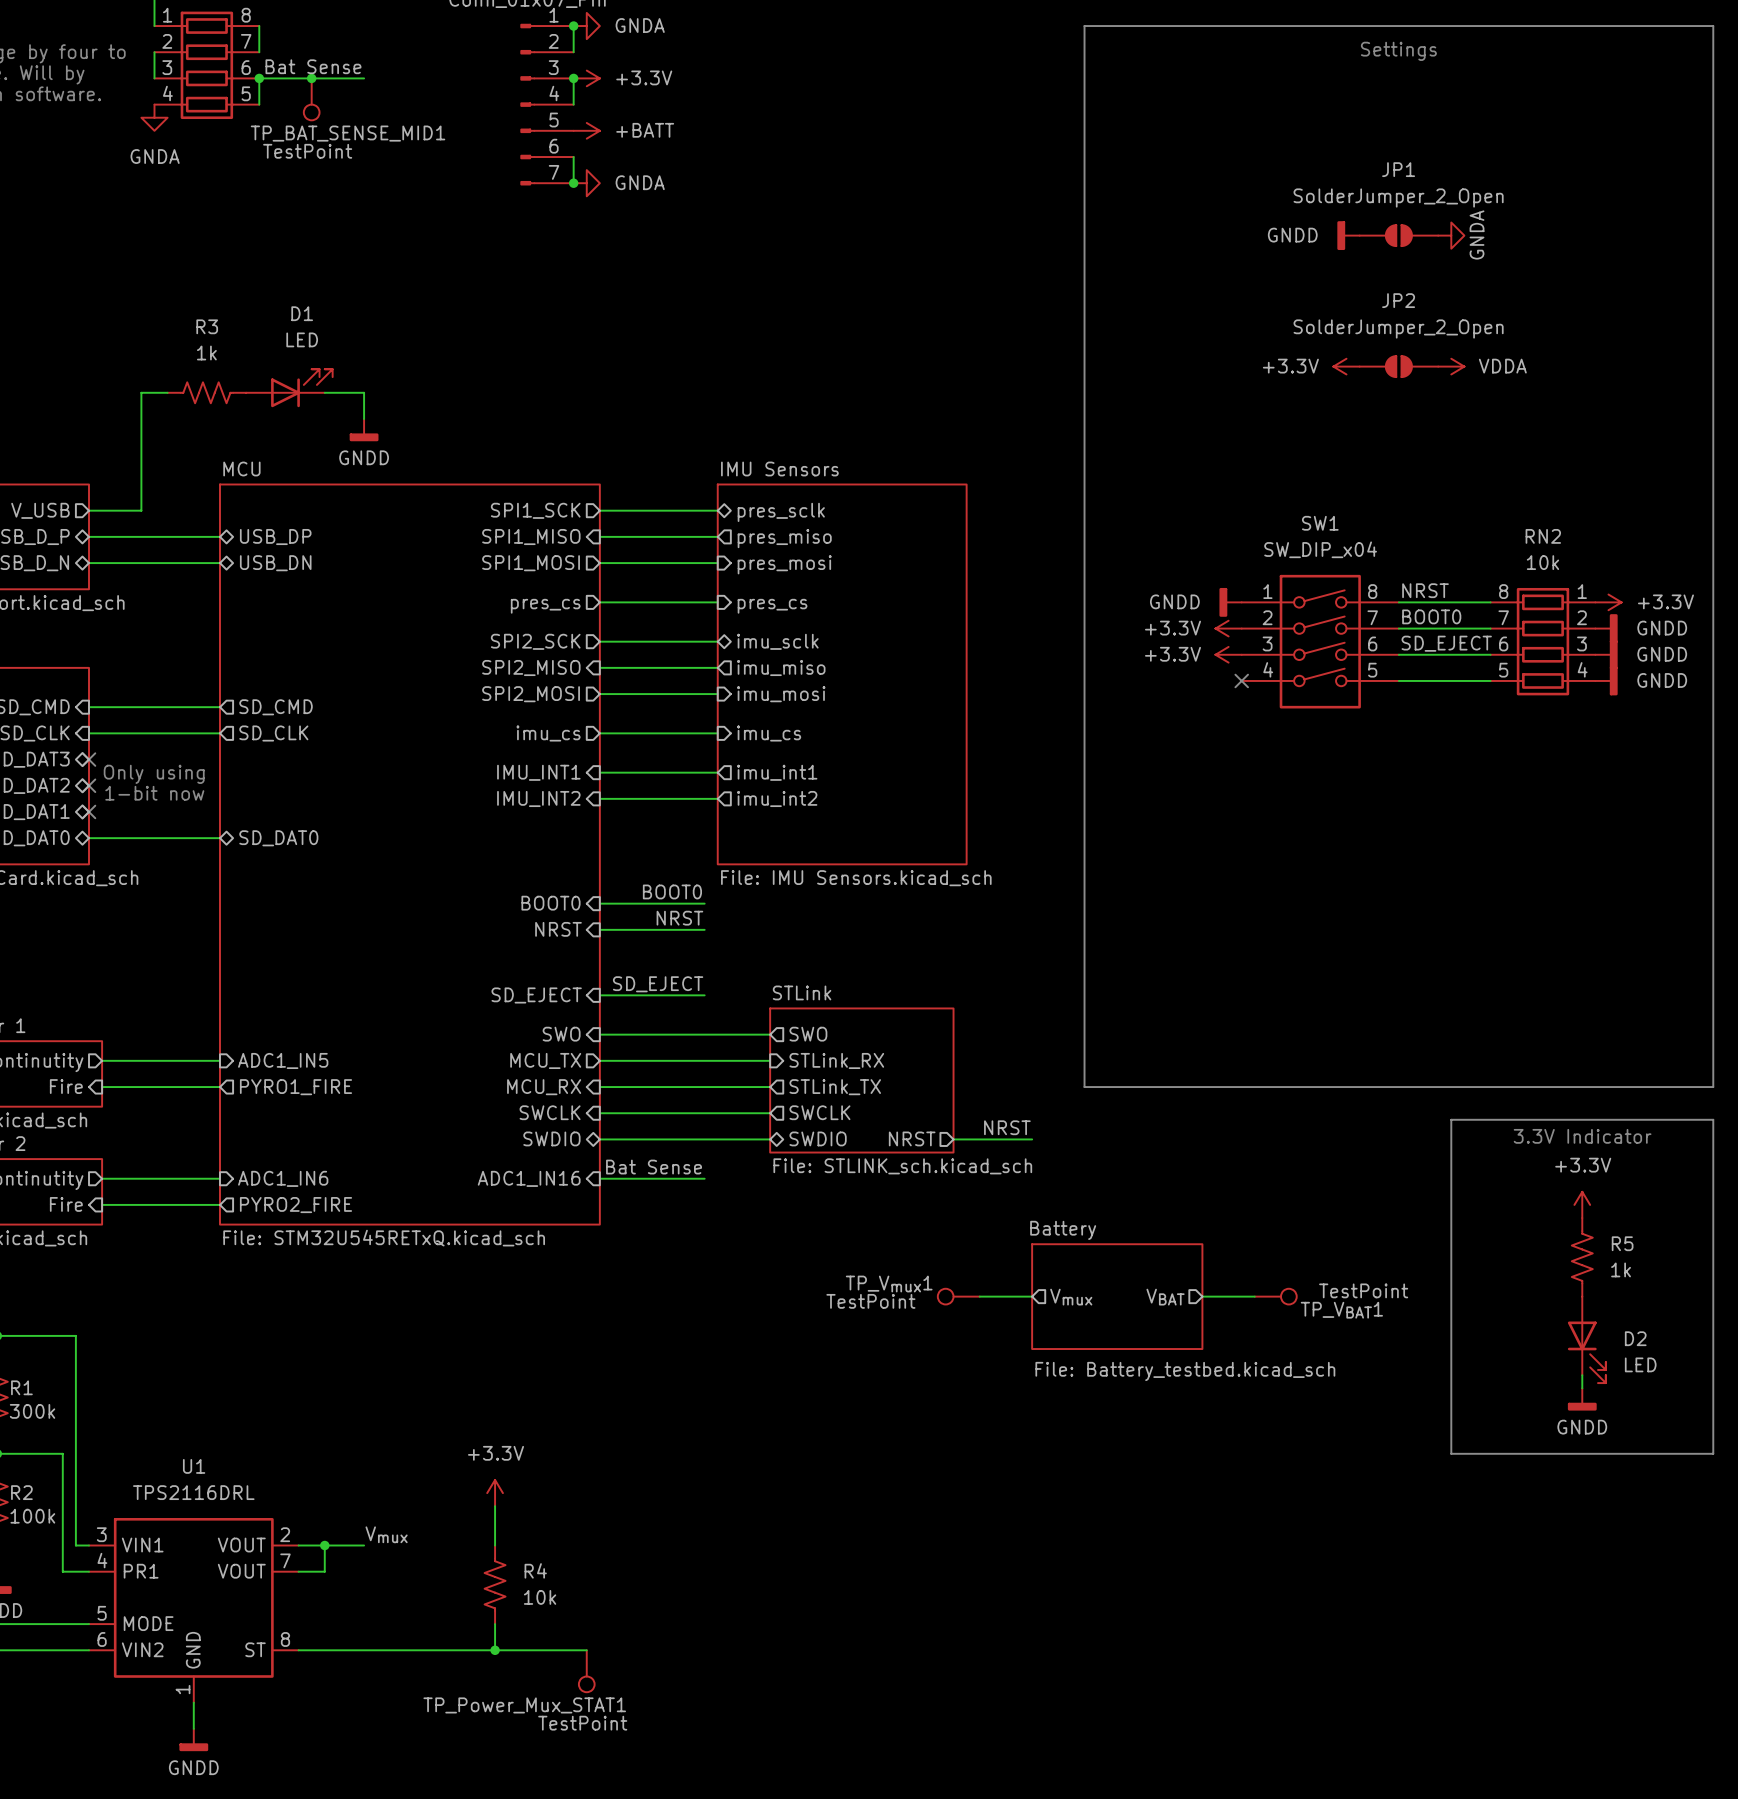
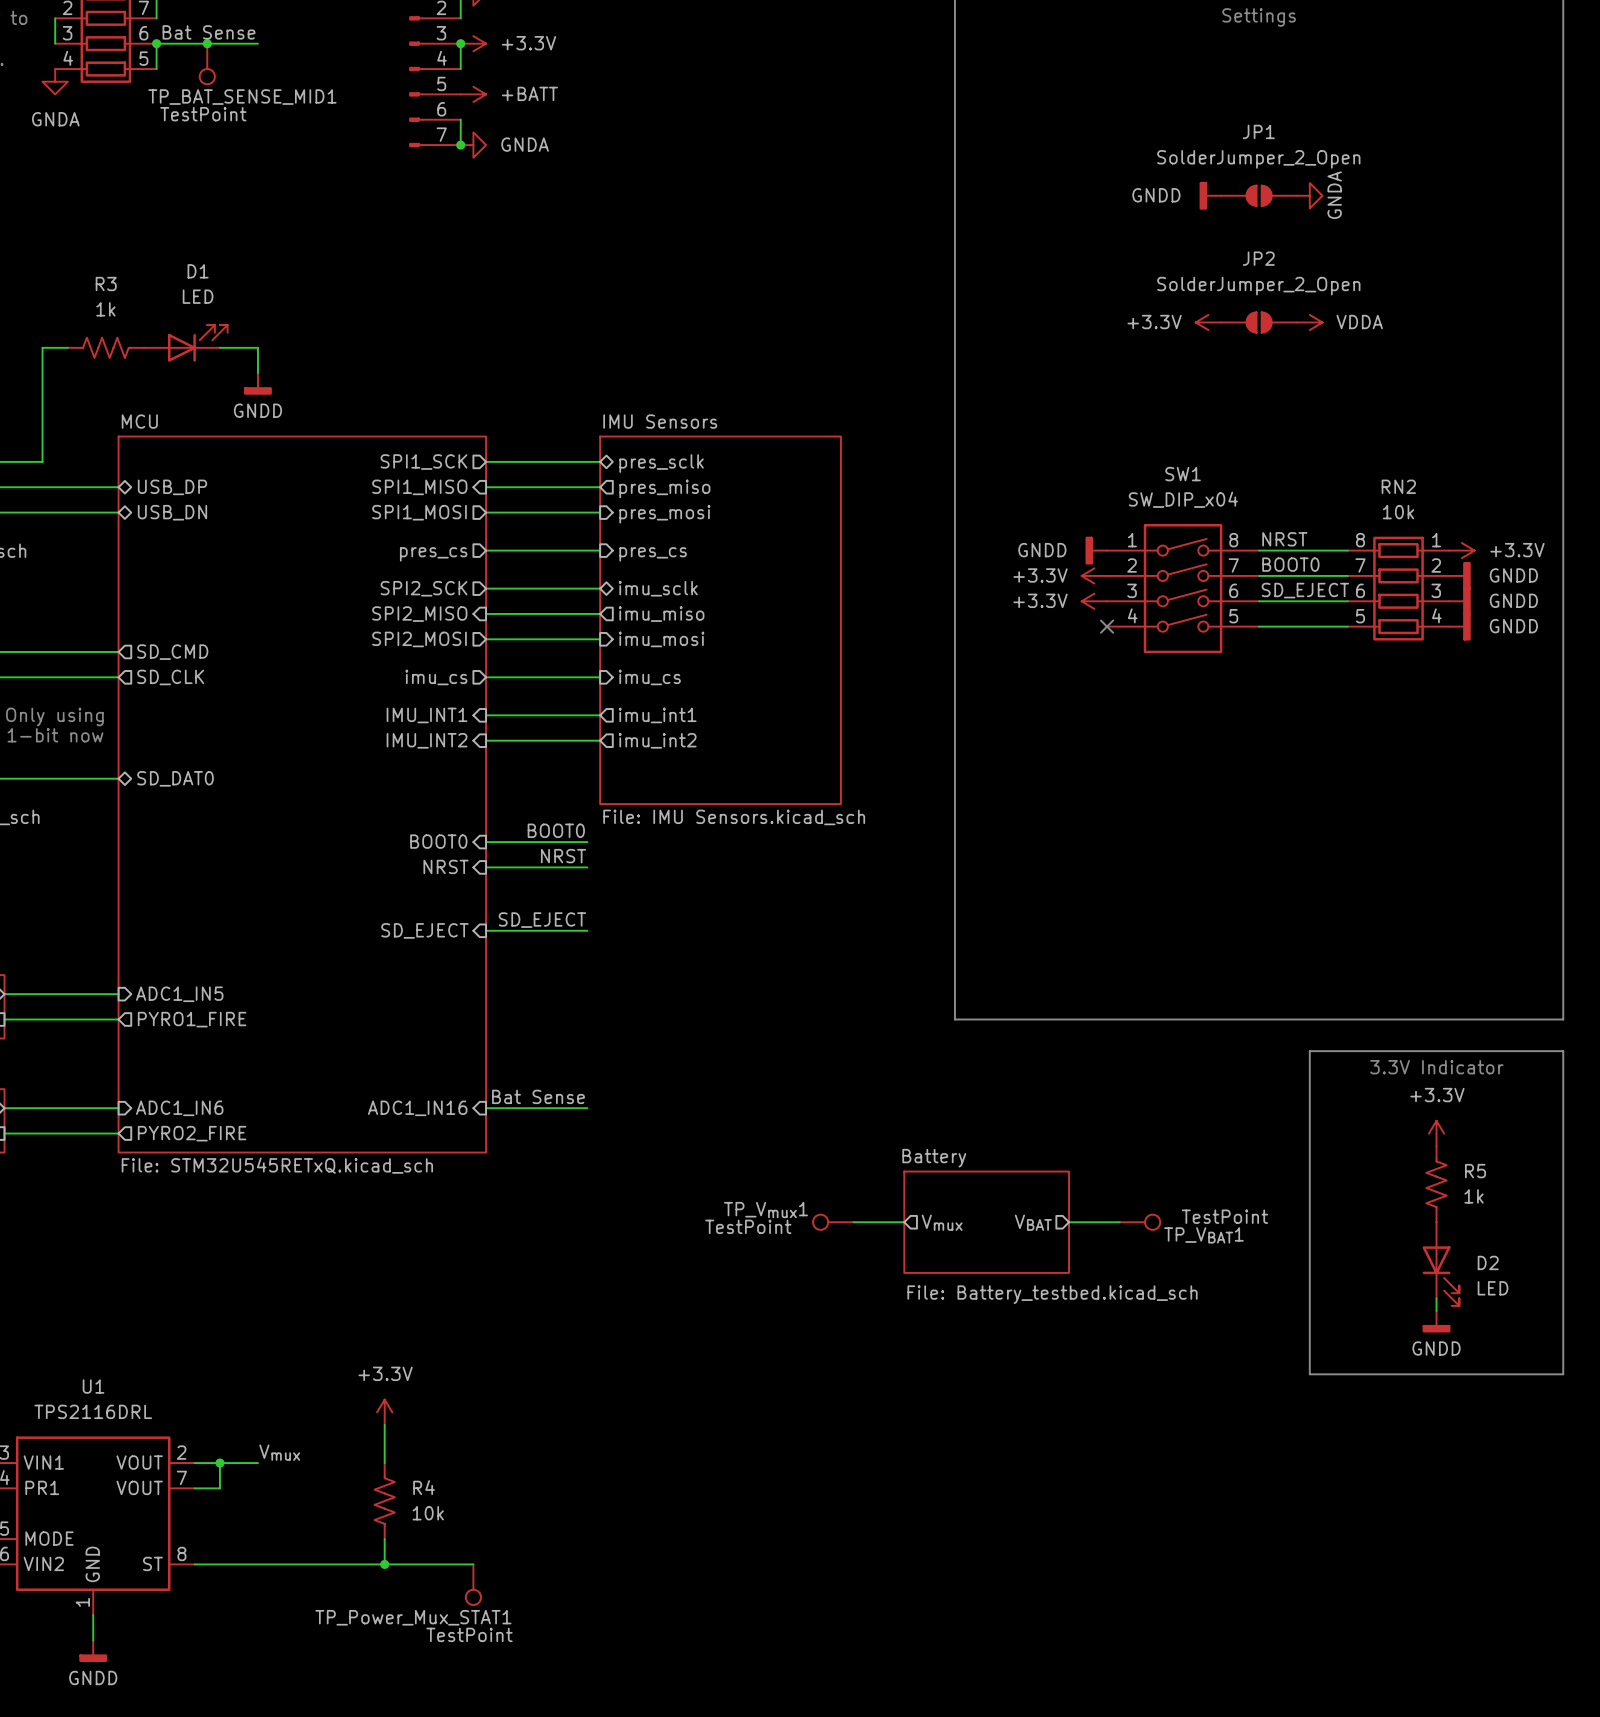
sheet pin: SWO (561, 1034) -> none
wire: (599, 1034) (770, 1034) -> none
sheet pin: SWO (808, 1034) -> none
sheet pin: MCU_TX (545, 1060) -> none
wire: (599, 1060) (770, 1060) -> none
sheet pin: STLink_RX (836, 1060) -> none
sheet STLink: File: STLINK_sch.kicad_sch (861, 1080) -> none
sheet pin: MCU_RX (544, 1087) -> none
wire: (599, 1087) (770, 1087) -> none
sheet pin: STLink_TX (835, 1087) -> none
sheet pin: SWCLK (550, 1112) -> none
sheet pin: SWCLK (819, 1112) -> none
wire: (599, 1113) (770, 1113) -> none
label: NRST (1007, 1127) -> none
sheet pin: SWDIO (551, 1138) -> none
sheet pin: SWDIO (818, 1138) -> none
sheet pin: NRST (912, 1138) -> none
wire: (599, 1139) (770, 1139) -> none
wire: (953, 1139) (1032, 1139) -> none

